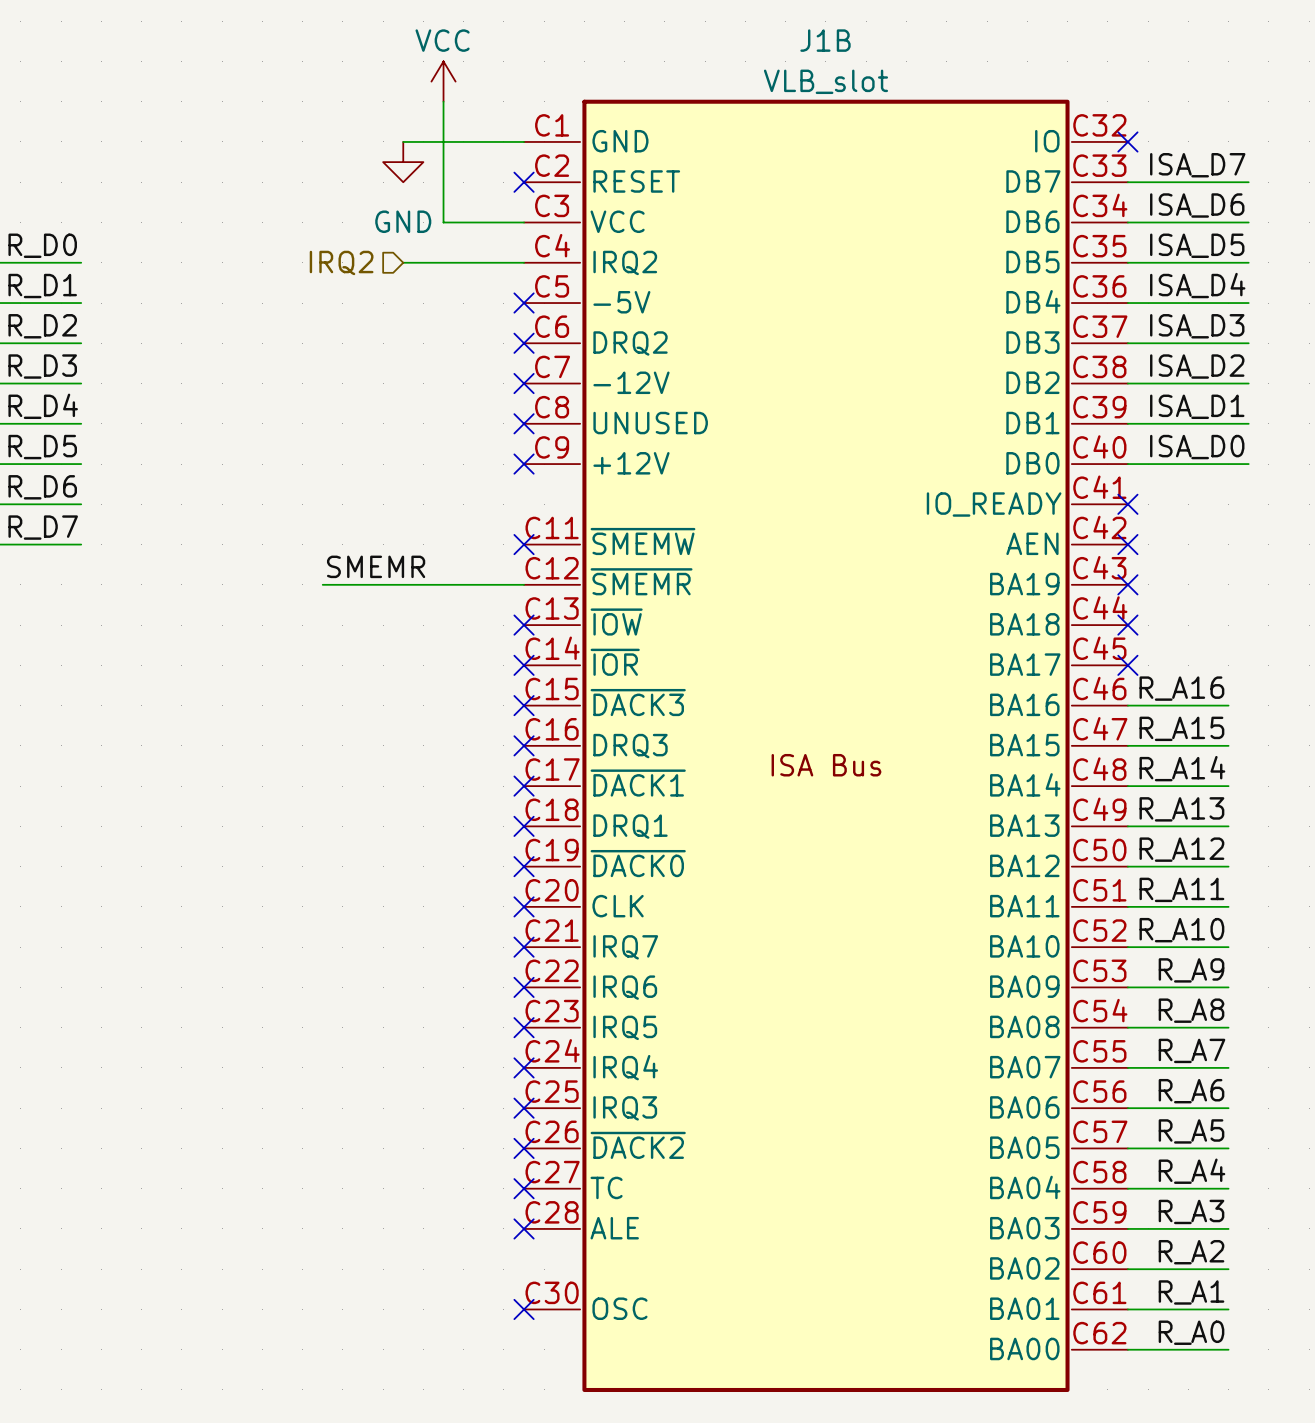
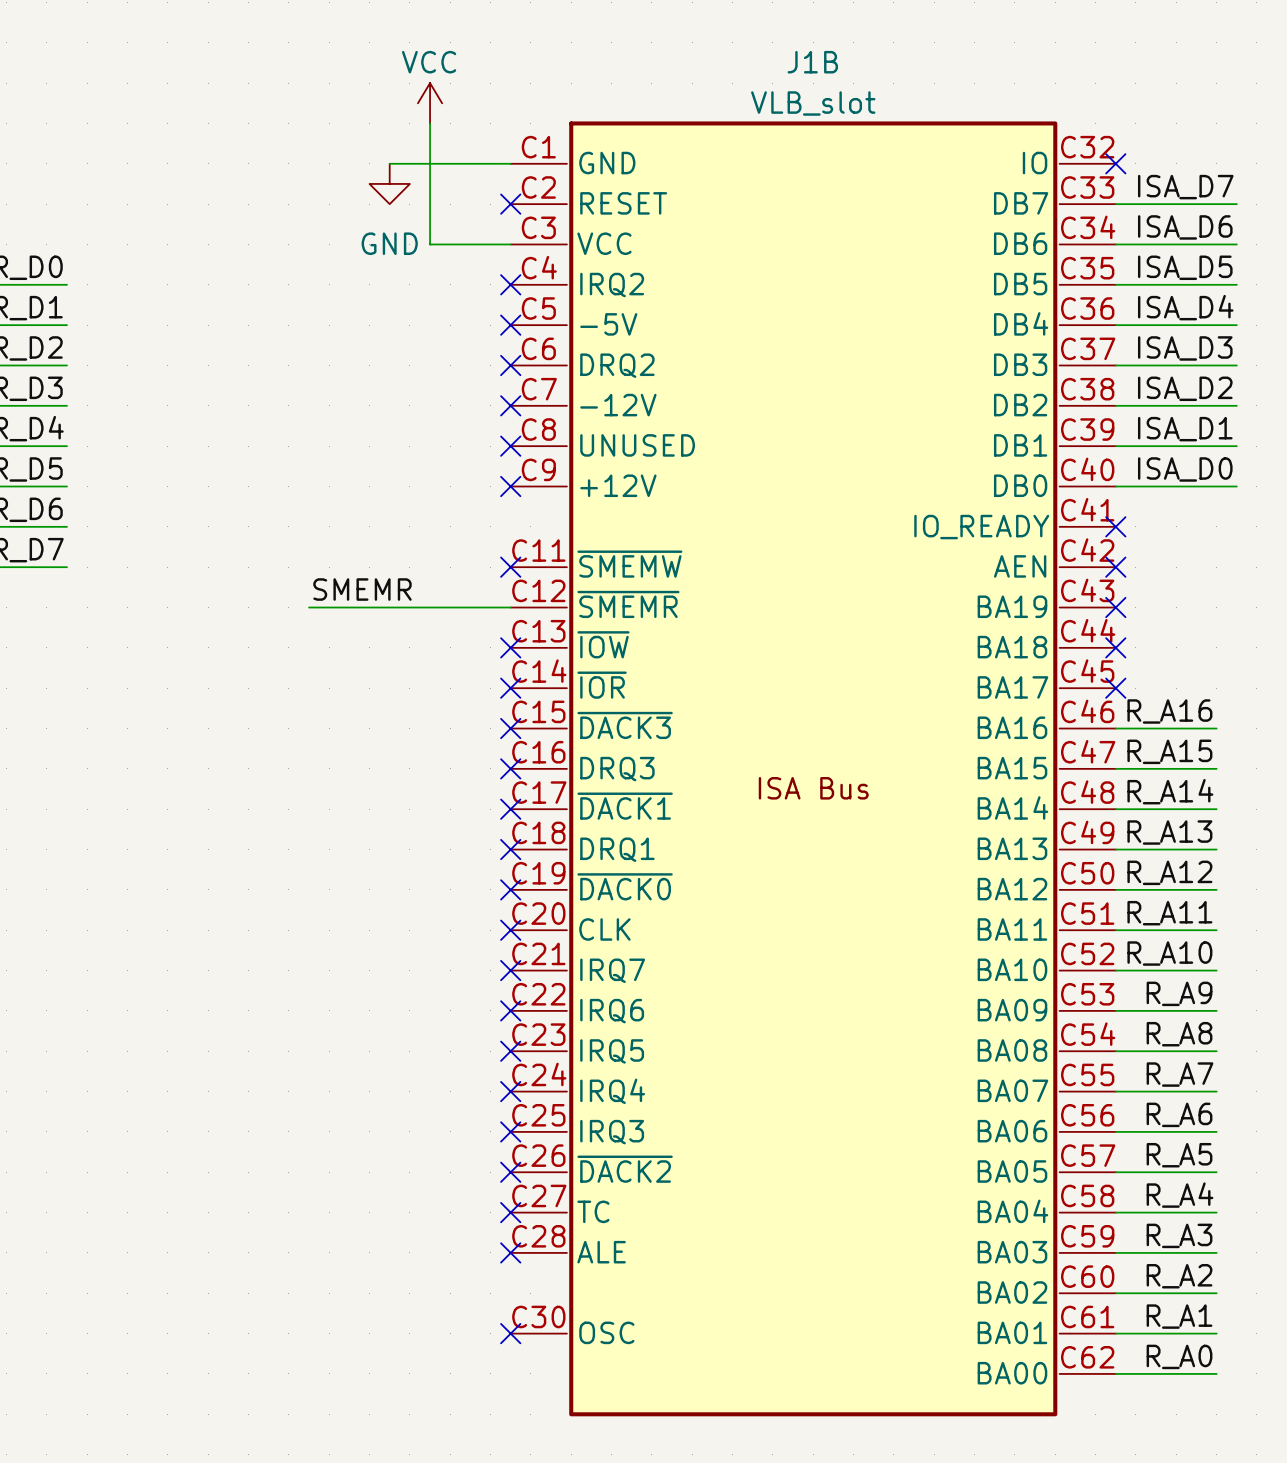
hierarchical label: IRQ2 (341, 262) -> none
wire: (403, 262) (524, 262) -> none
no-connect mark: none -> (510, 284)

